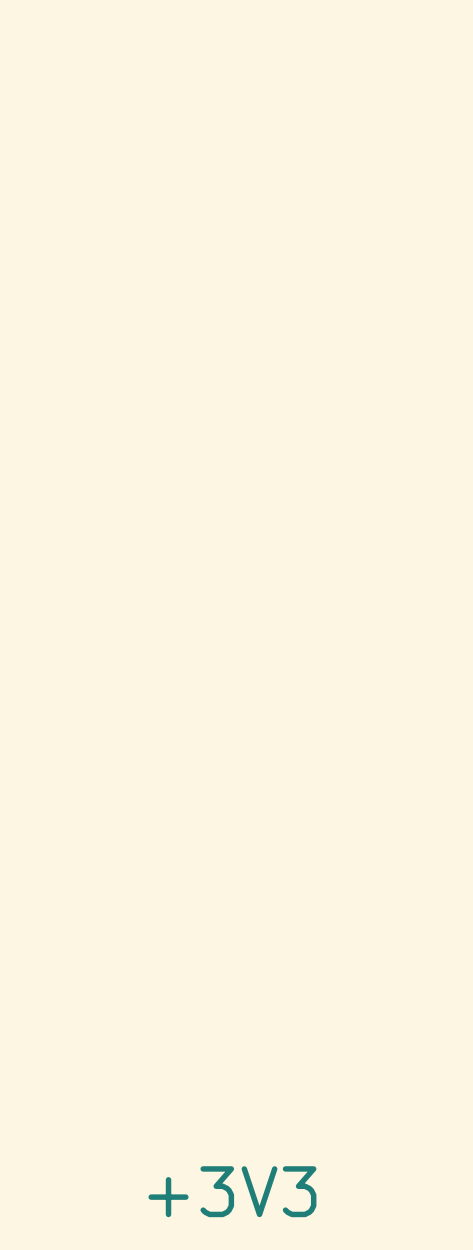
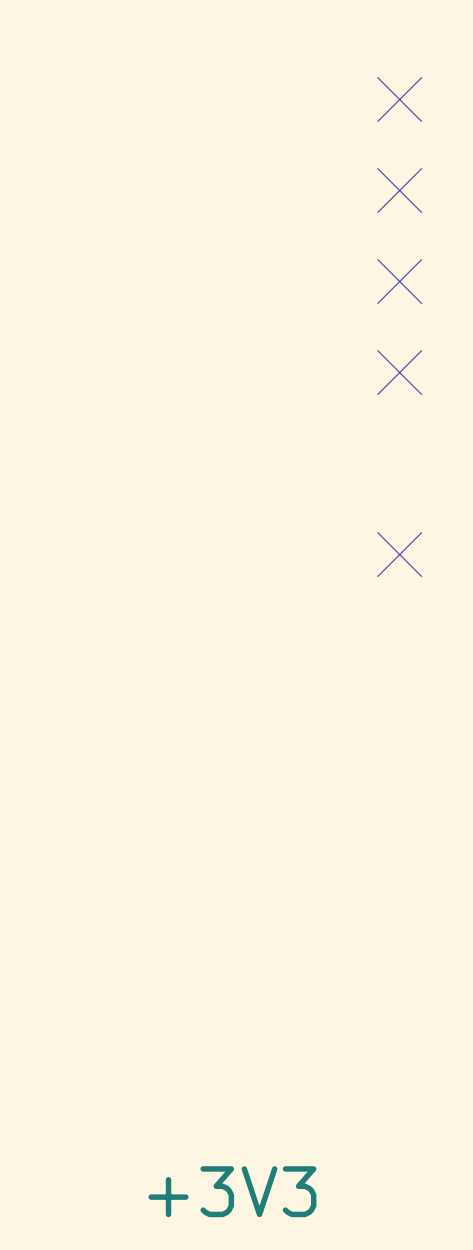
no-connect mark: none -> (399, 99)
no-connect mark: none -> (399, 190)
no-connect mark: none -> (399, 281)
no-connect mark: none -> (399, 372)
no-connect mark: none -> (399, 554)

